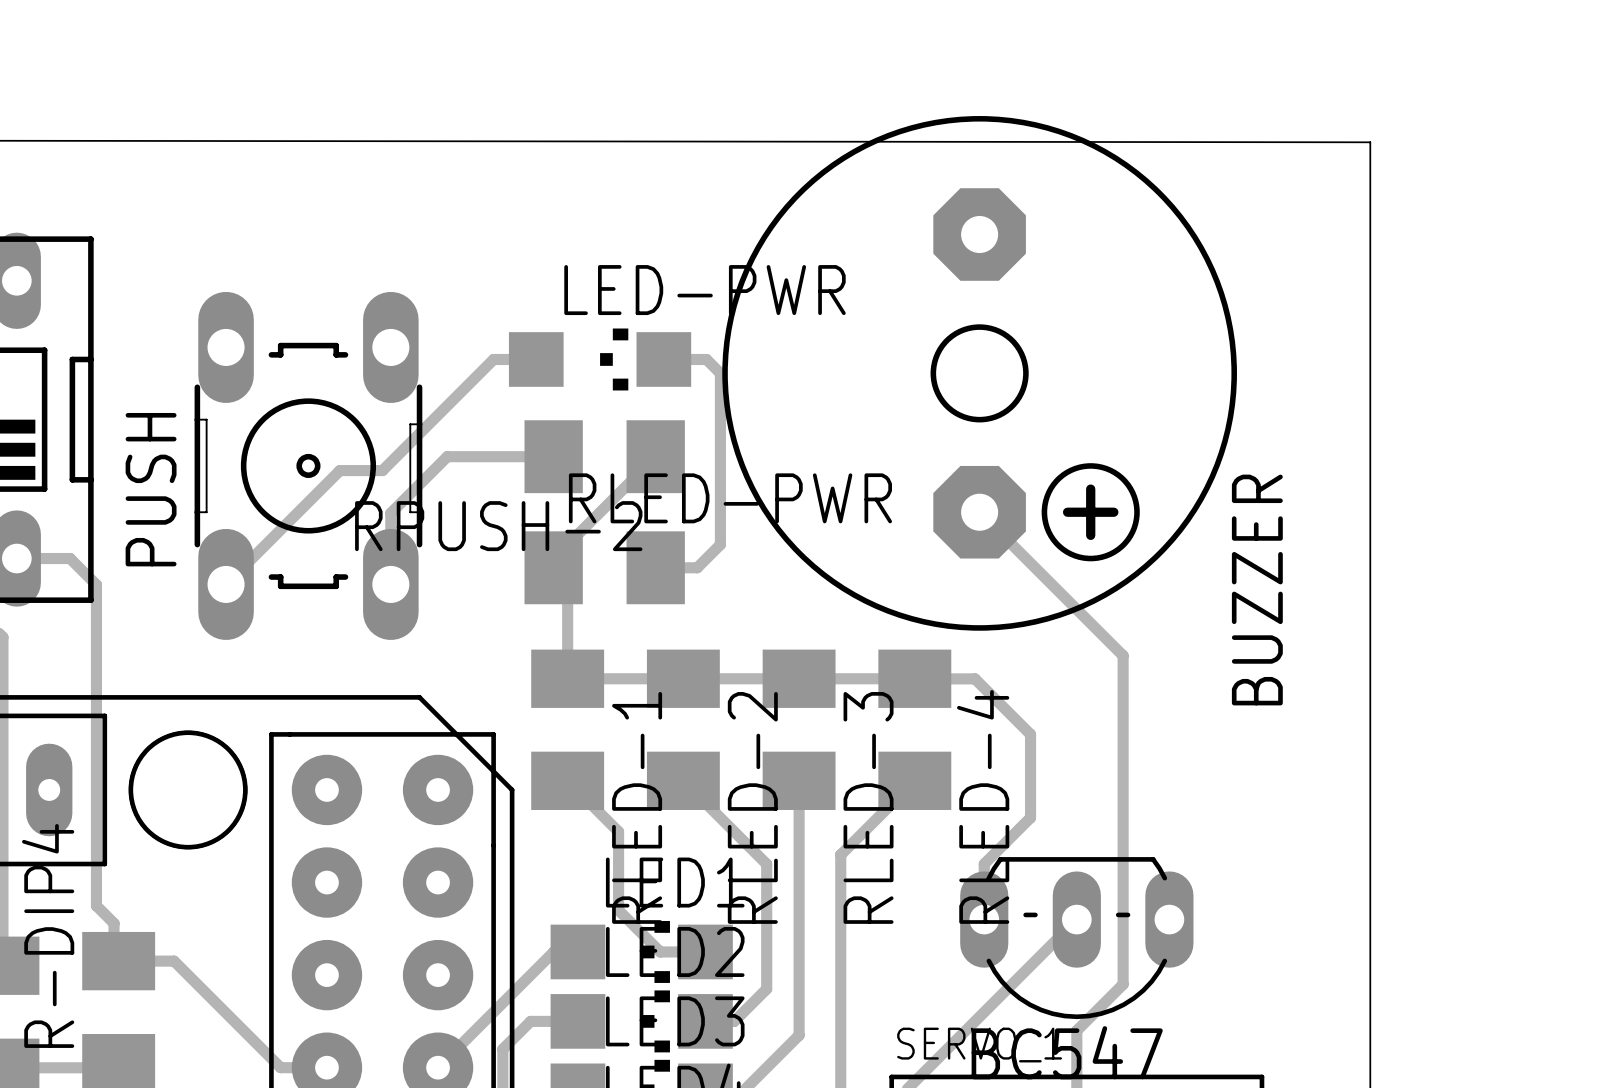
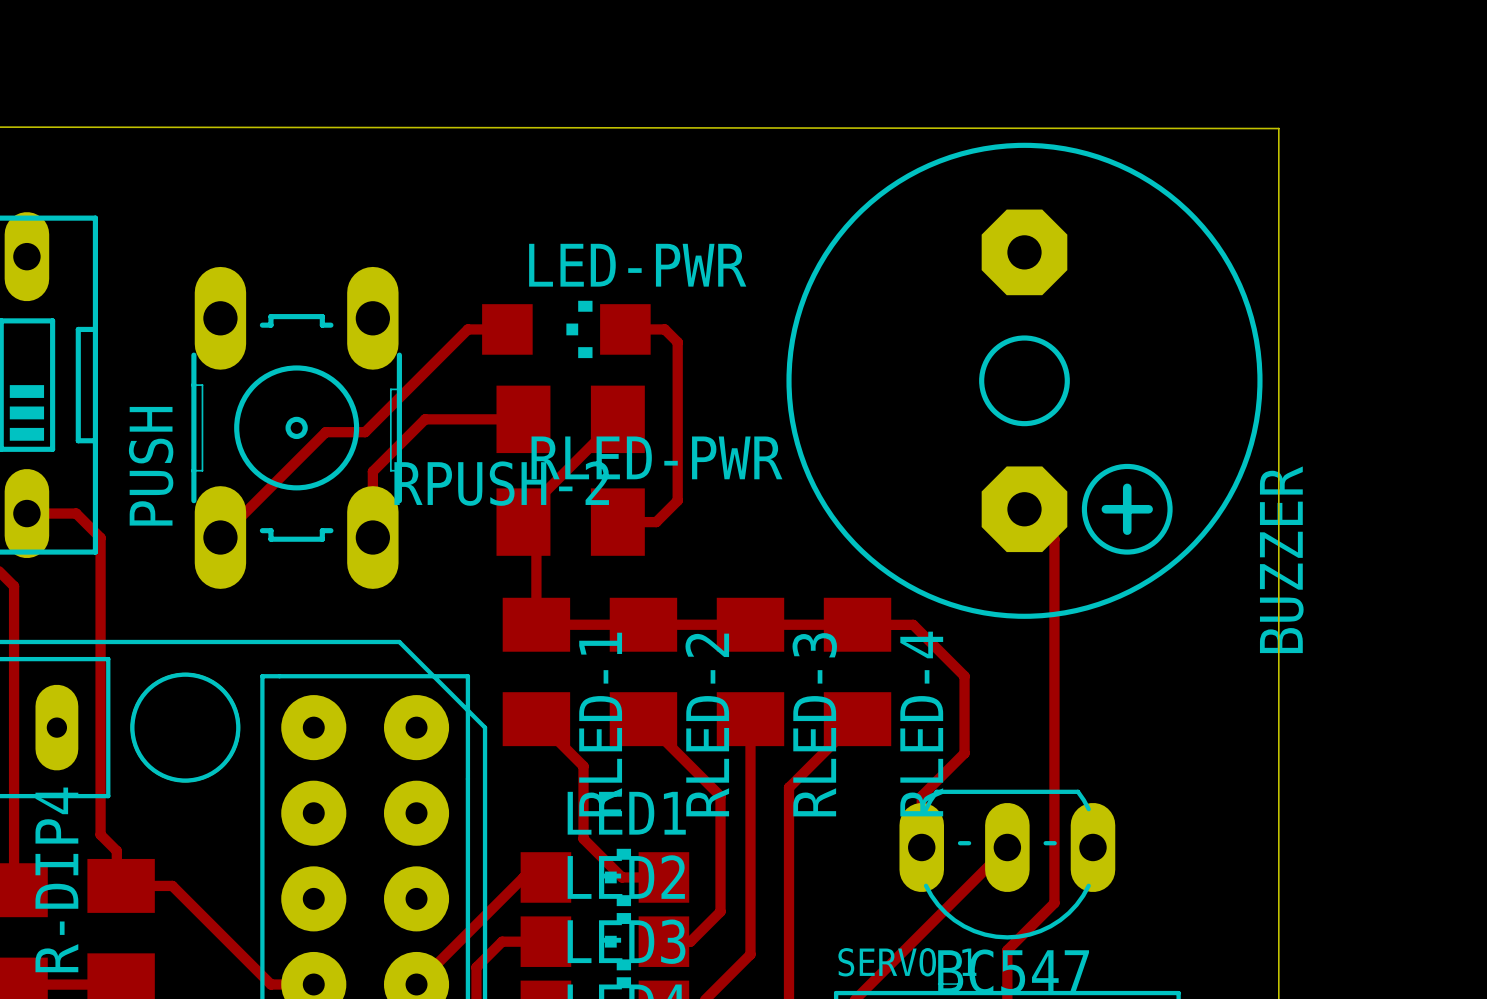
BUZZER position: (979, 373) -> (1024, 380)
track: (979, 512) (1123, 655) (1123, 984) -> (1024, 509) (1054, 539) (1054, 903) (1050, 907)

